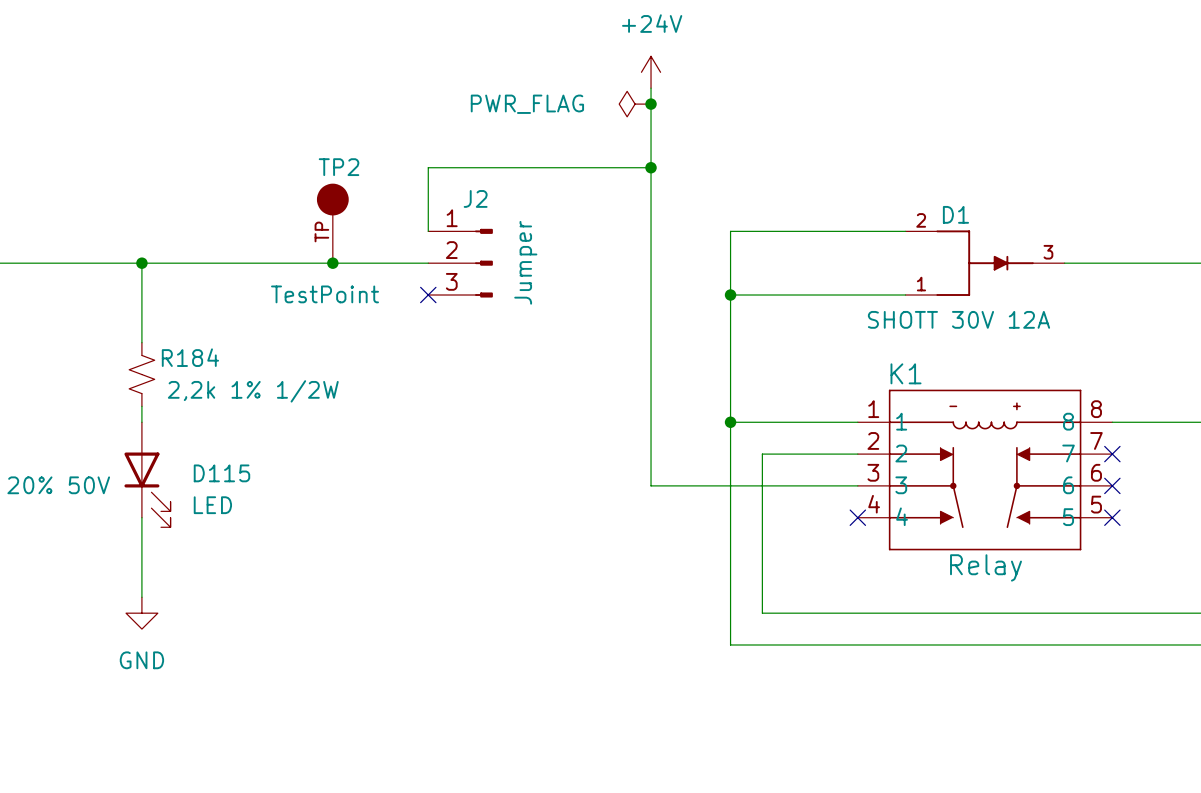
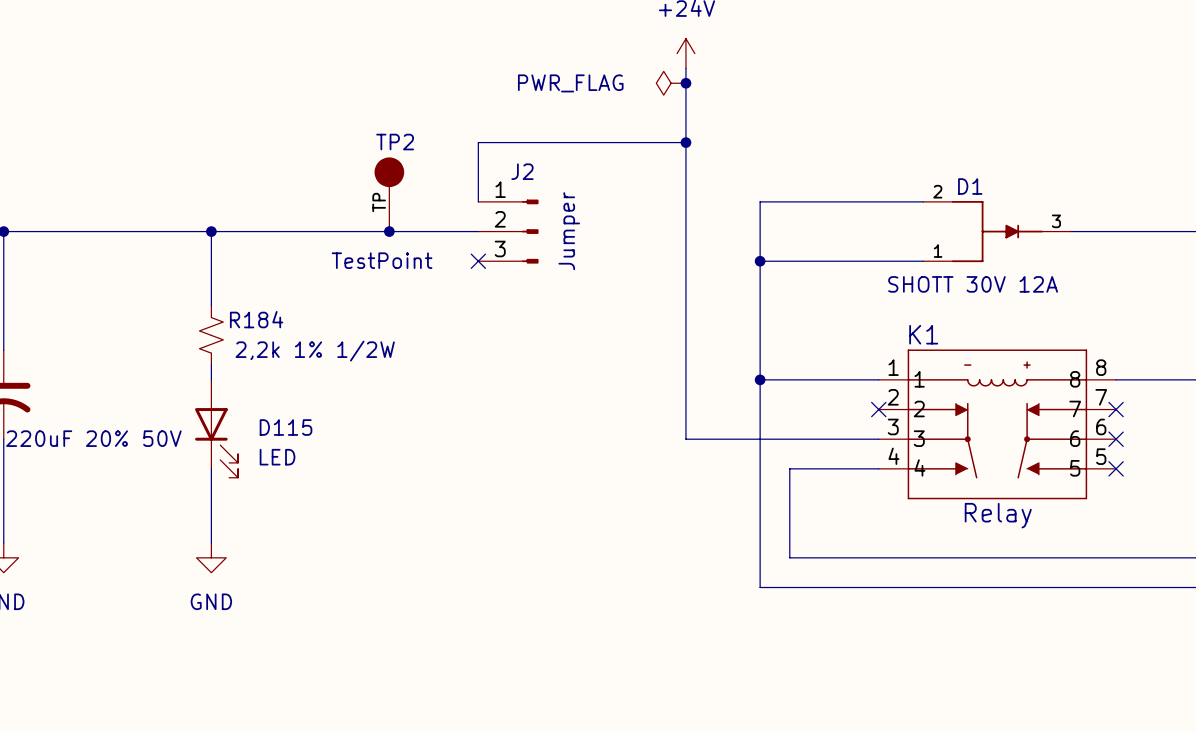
wire: (857, 454) (762, 454) (762, 517) -> (878, 468) (789, 468)
no-connect mark position: (857, 517) -> (878, 409)

